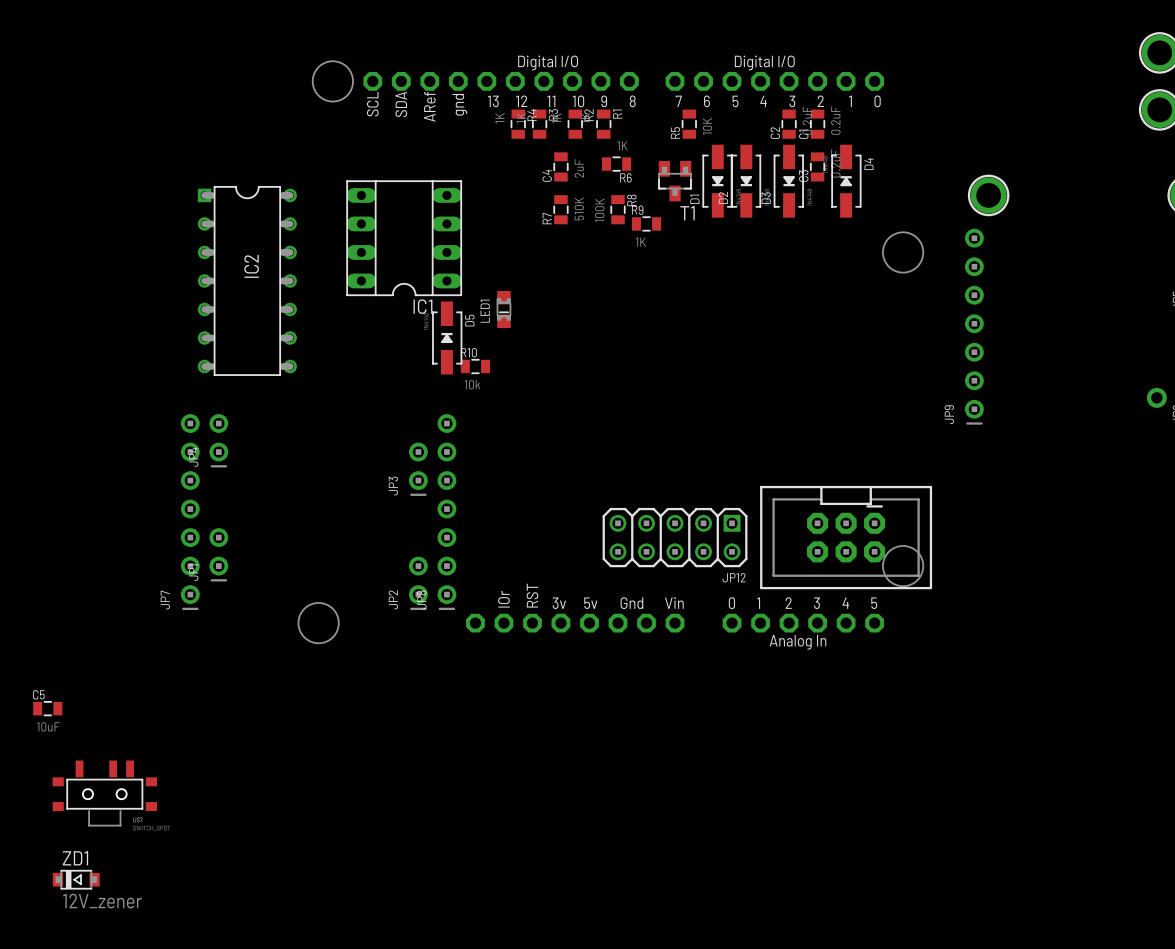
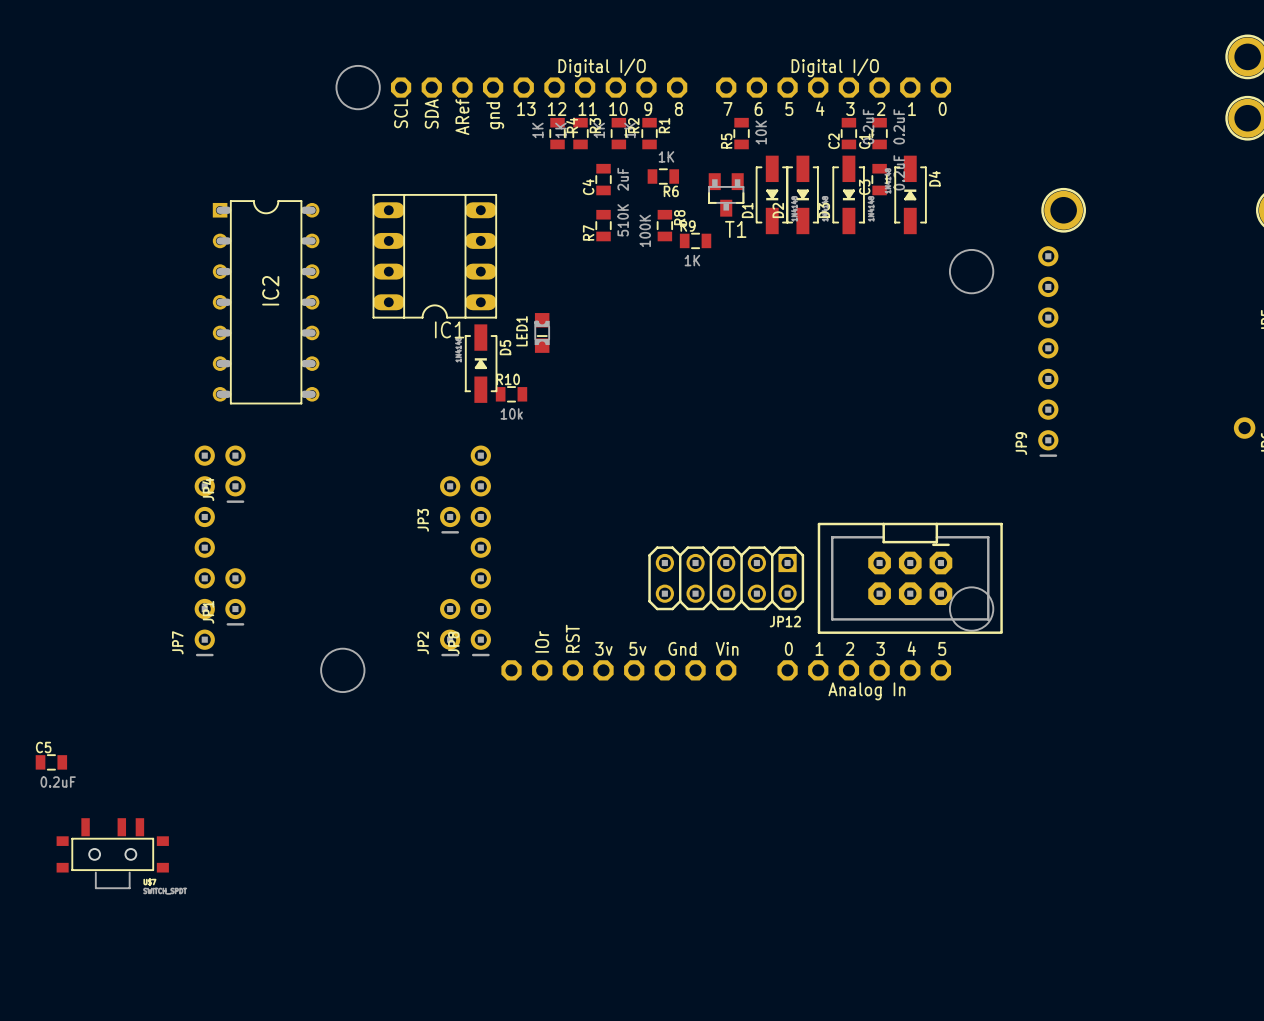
C5 value: 10uF (48, 726) -> 0.2uF (58, 782)
ZD1: 12V_zener (76, 879) -> none

